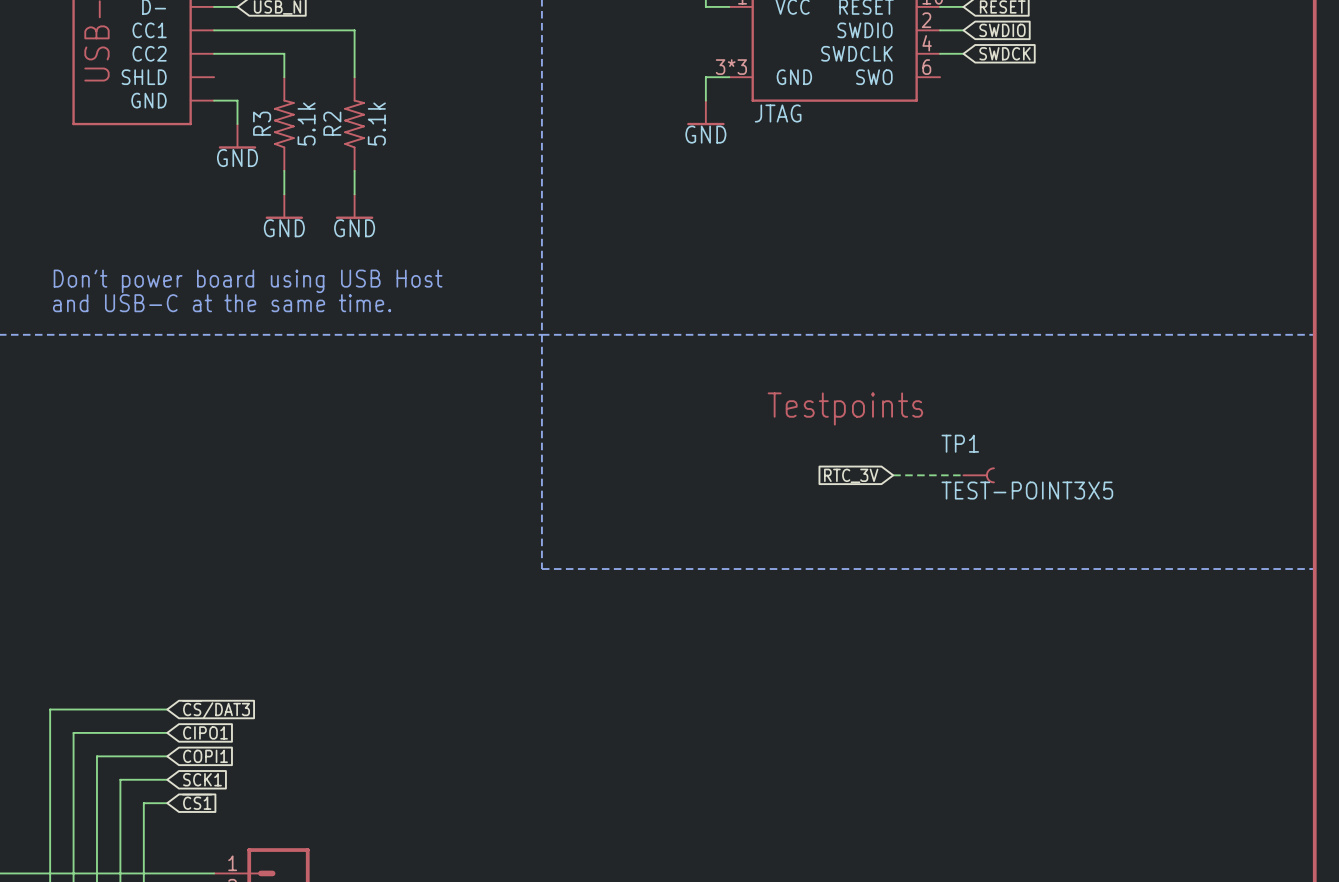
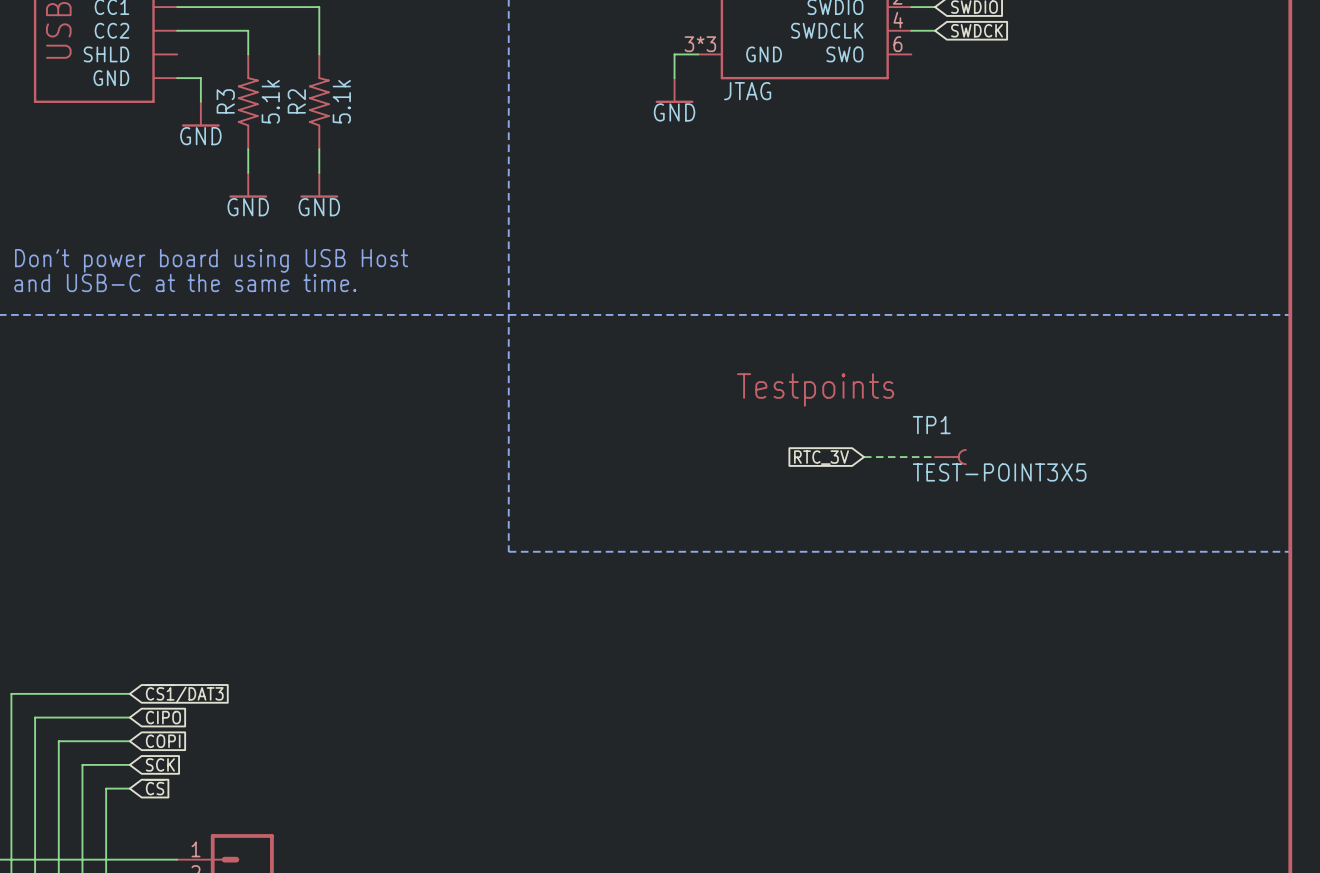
global label: ~{CS}/DAT3 (216, 709) -> ~{CS1}/DAT3 (184, 693)
global label: CIPO1 (205, 732) -> CIPO (163, 717)
global label: COPI1 (205, 756) -> COPI (163, 741)
global label: SCK1 (202, 779) -> SCK (160, 764)
global label: ~{CS1} (197, 801) -> ~{CS} (155, 787)

